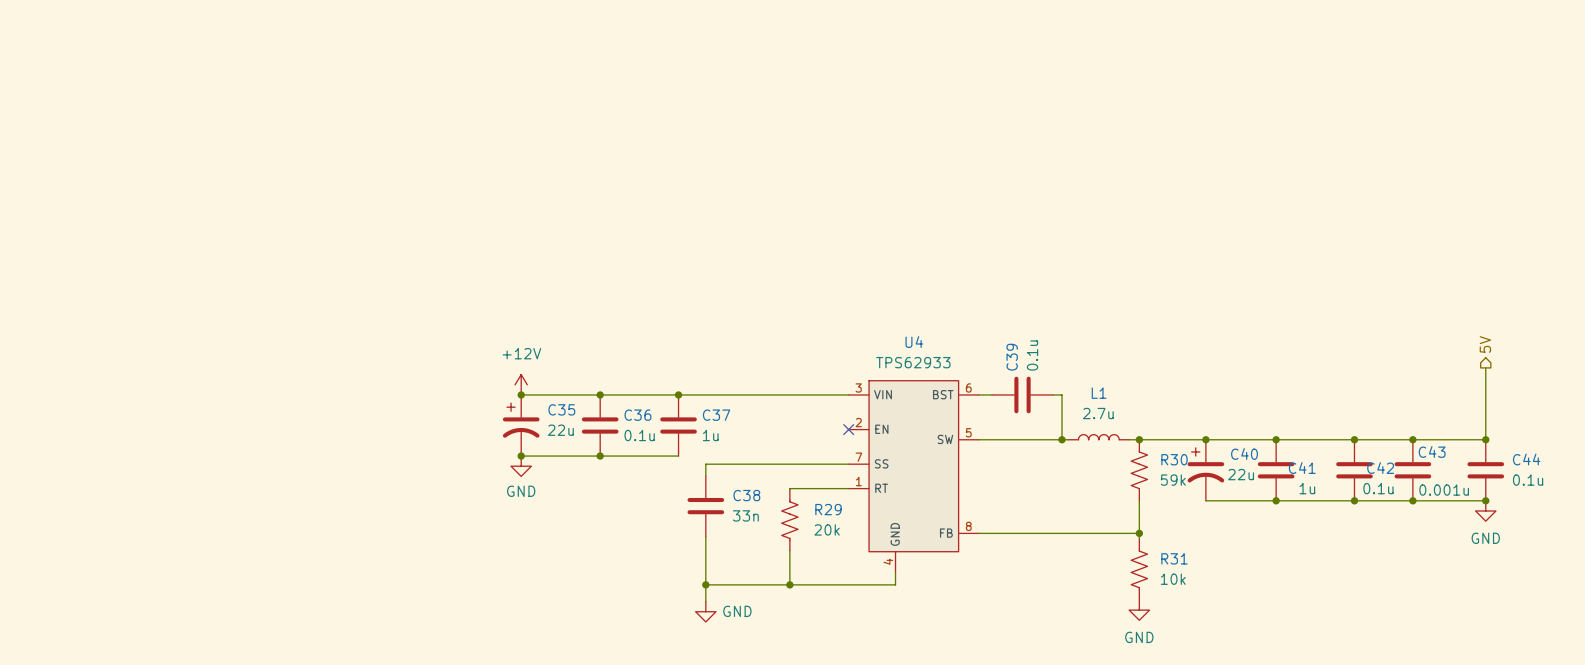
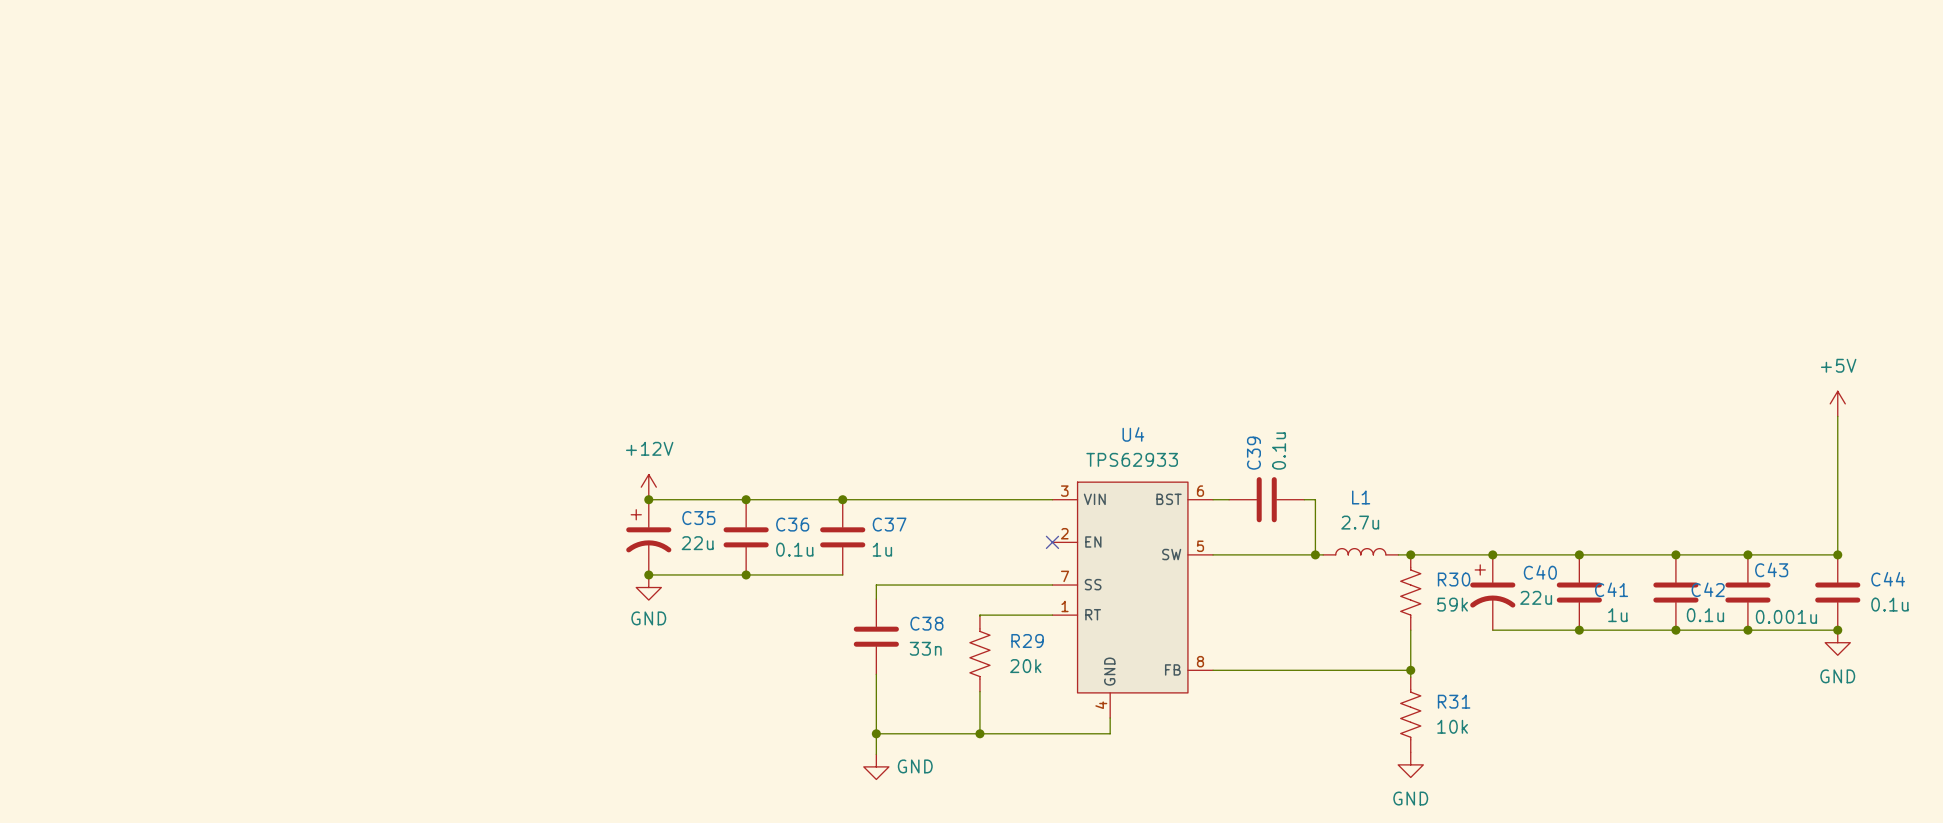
power symbol: none -> +5V (1837, 403)
wire: none -> (1837, 416) (1837, 466)
hierarchical label: 5V (1485, 344) -> none

